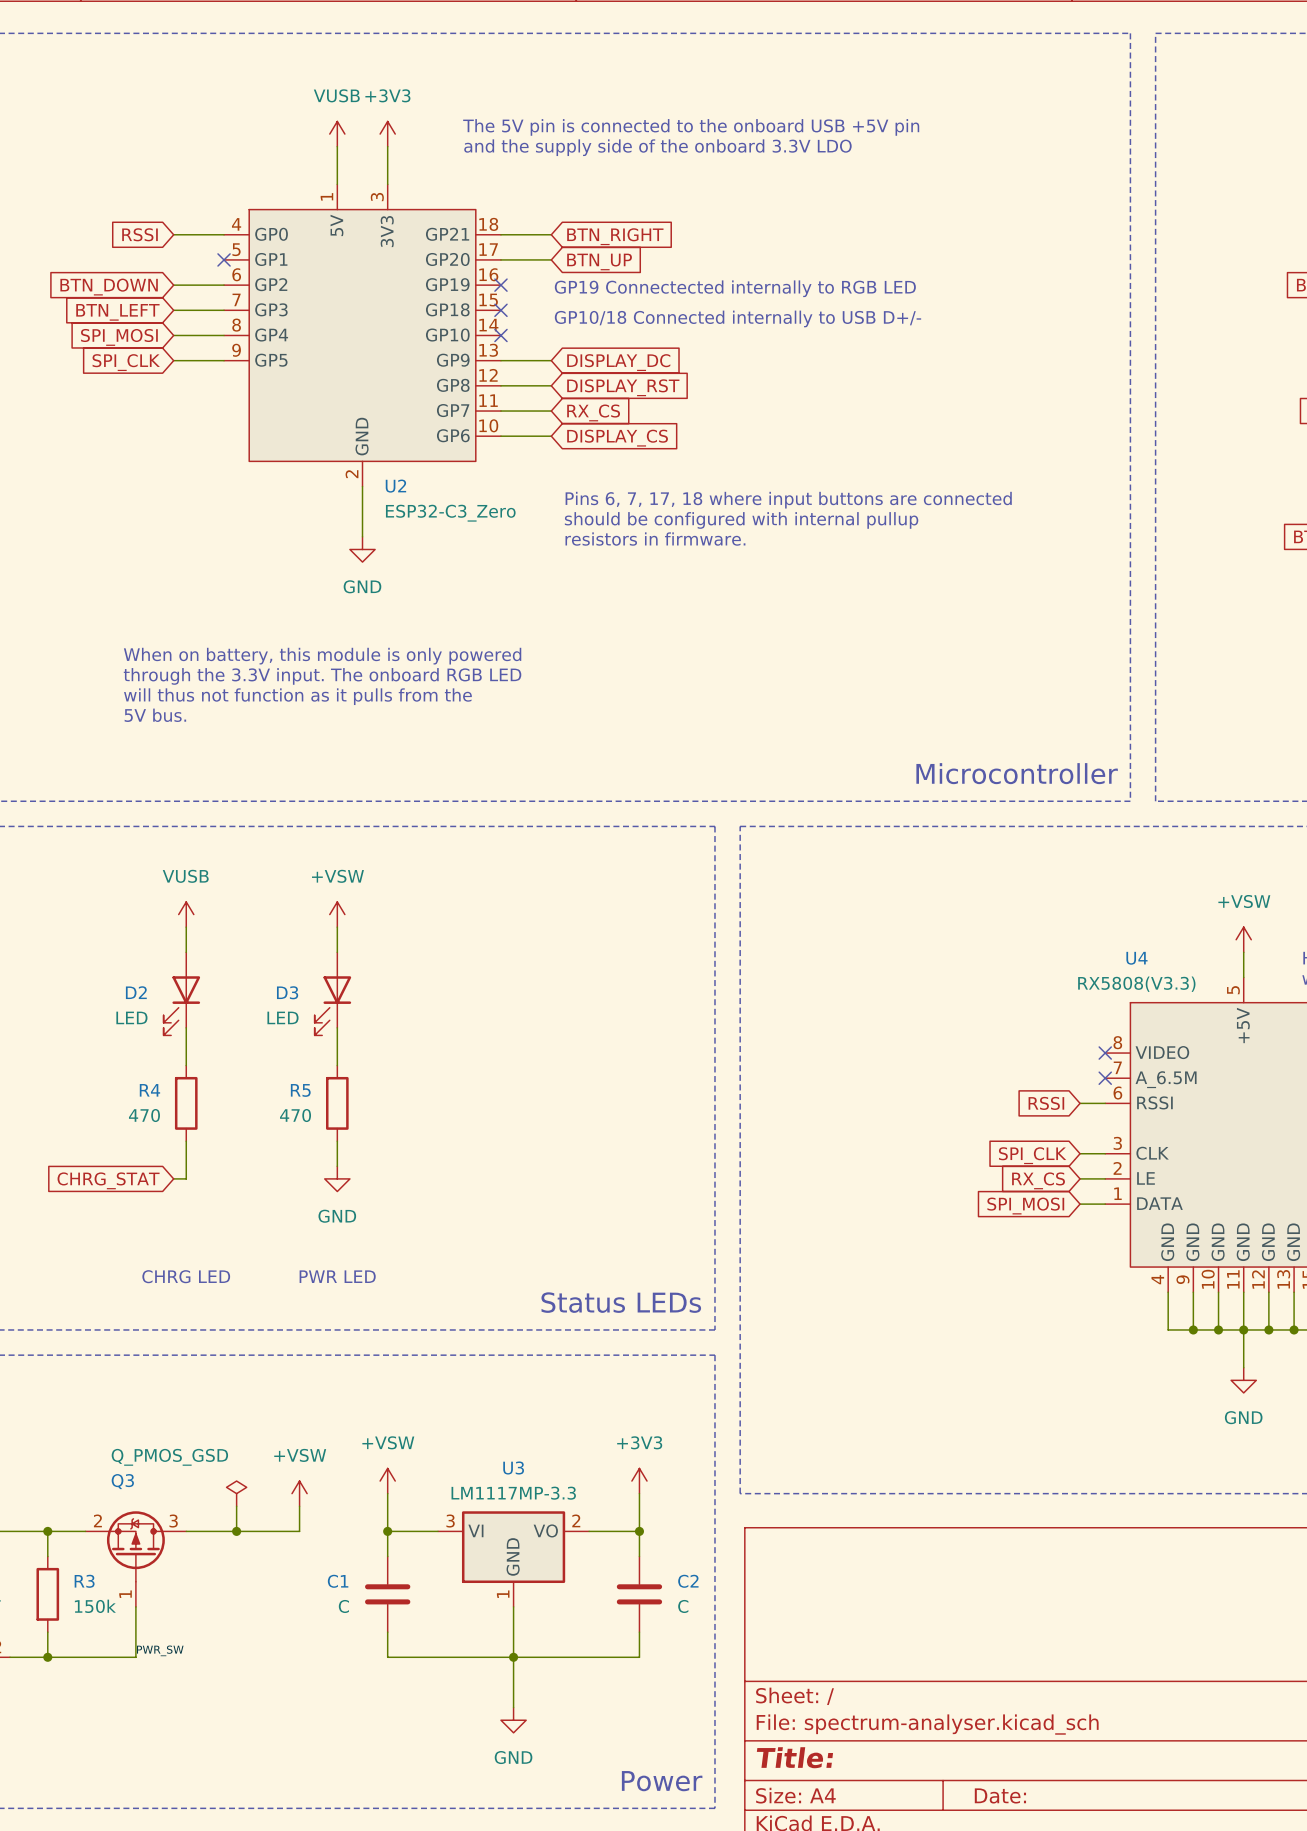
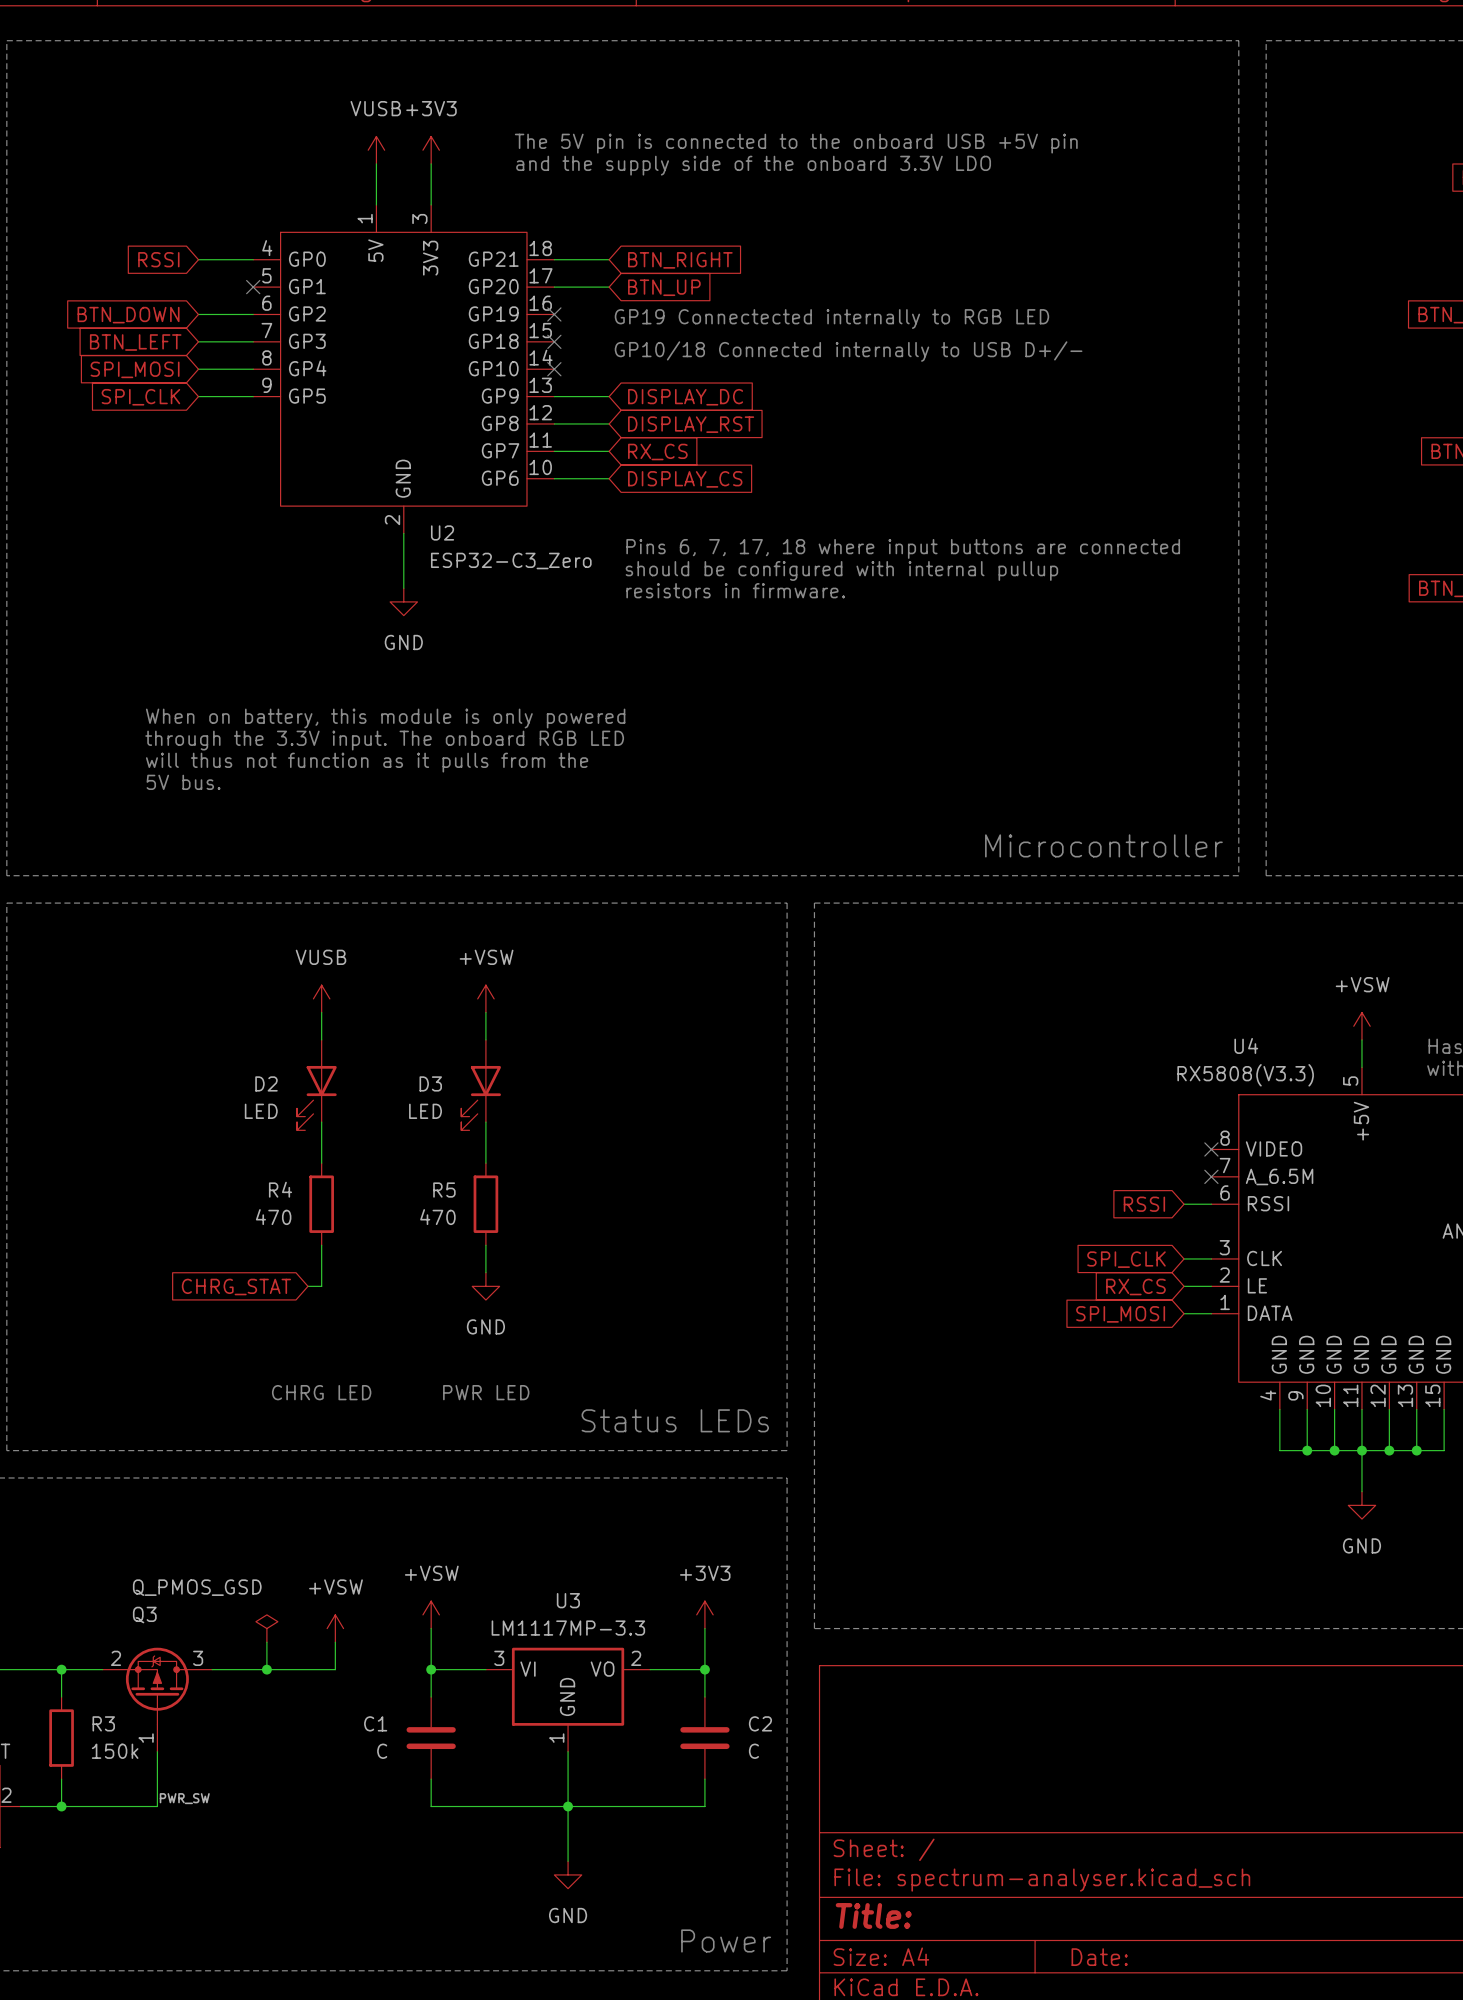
power symbol position: VUSB (186, 914) -> VUSB (321, 998)
power symbol position: +VSW (337, 914) -> +VSW (485, 998)
wire: (186, 927) (186, 952) -> (321, 1012) (321, 1039)
wire: (337, 927) (337, 952) -> (485, 1012) (485, 1039)
D2 position: (181, 993) -> (316, 1085)
D3 position: (332, 993) -> (481, 1085)
wire: (186, 1027) (186, 1065) -> (321, 1122) (321, 1163)
wire: (337, 1027) (337, 1065) -> (485, 1122) (485, 1163)
R4 position: (186, 1103) -> (321, 1204)
R5 position: (337, 1103) -> (485, 1204)
wire: (186, 1141) (186, 1178) (173, 1178) -> (321, 1245) (321, 1286) (307, 1286)
wire: (337, 1141) (337, 1166) -> (485, 1245) (485, 1272)
power symbol position: GND (337, 1178) -> GND (485, 1286)
global label position: CHRG_STAT (108, 1180) -> CHRG_STAT (236, 1287)
text position: CHRG LED (186, 1276) -> CHRG LED (321, 1392)
text position: PWR LED (337, 1276) -> PWR LED (486, 1392)

